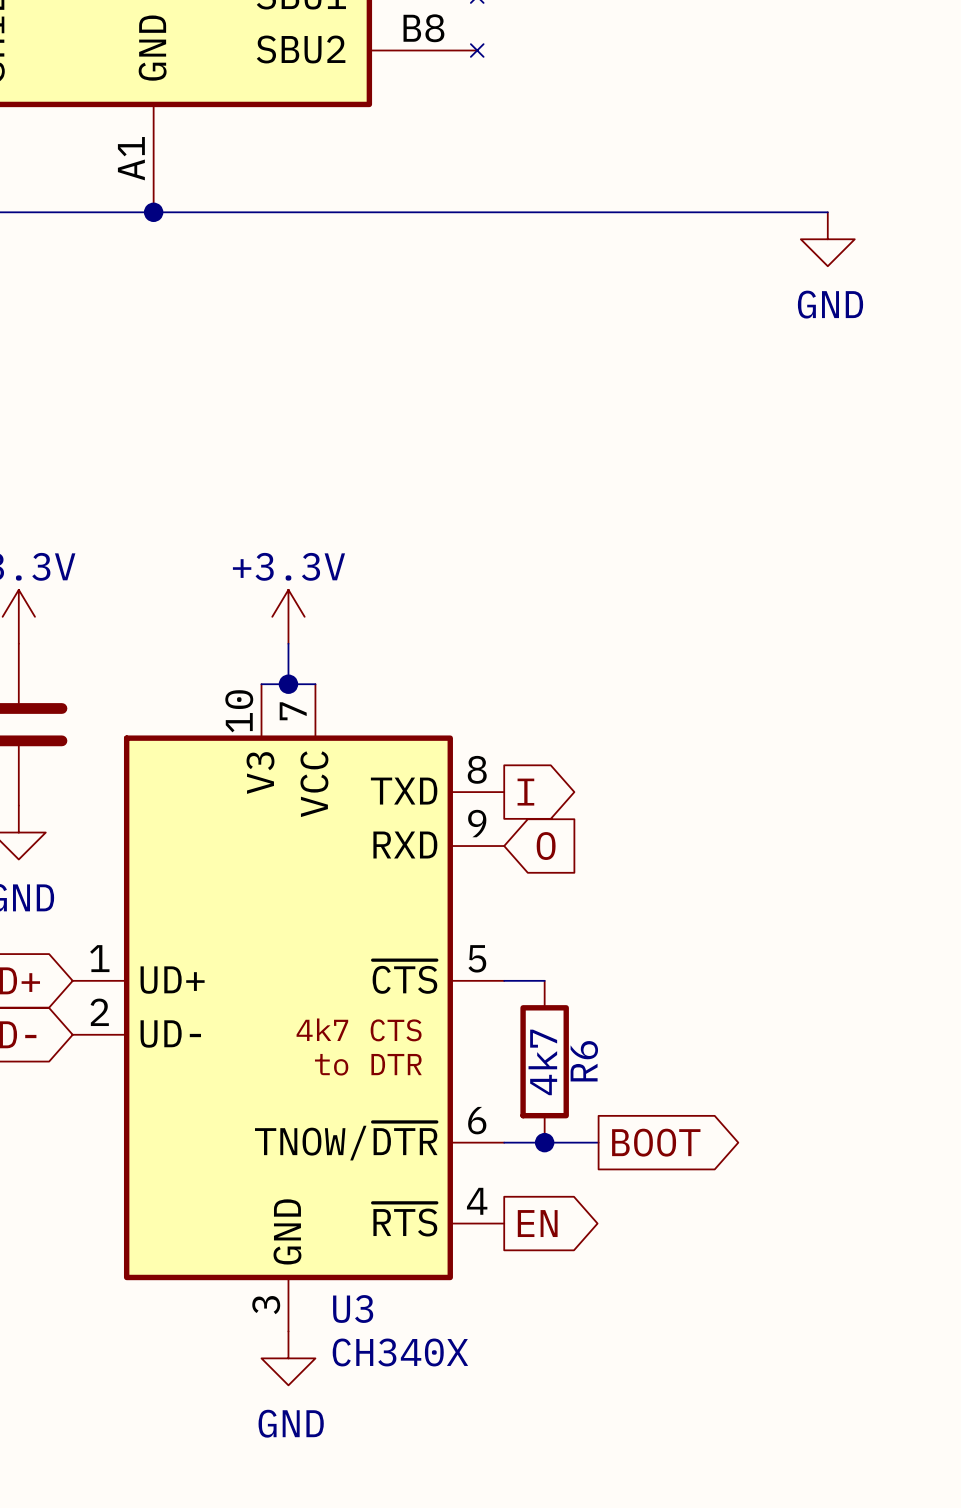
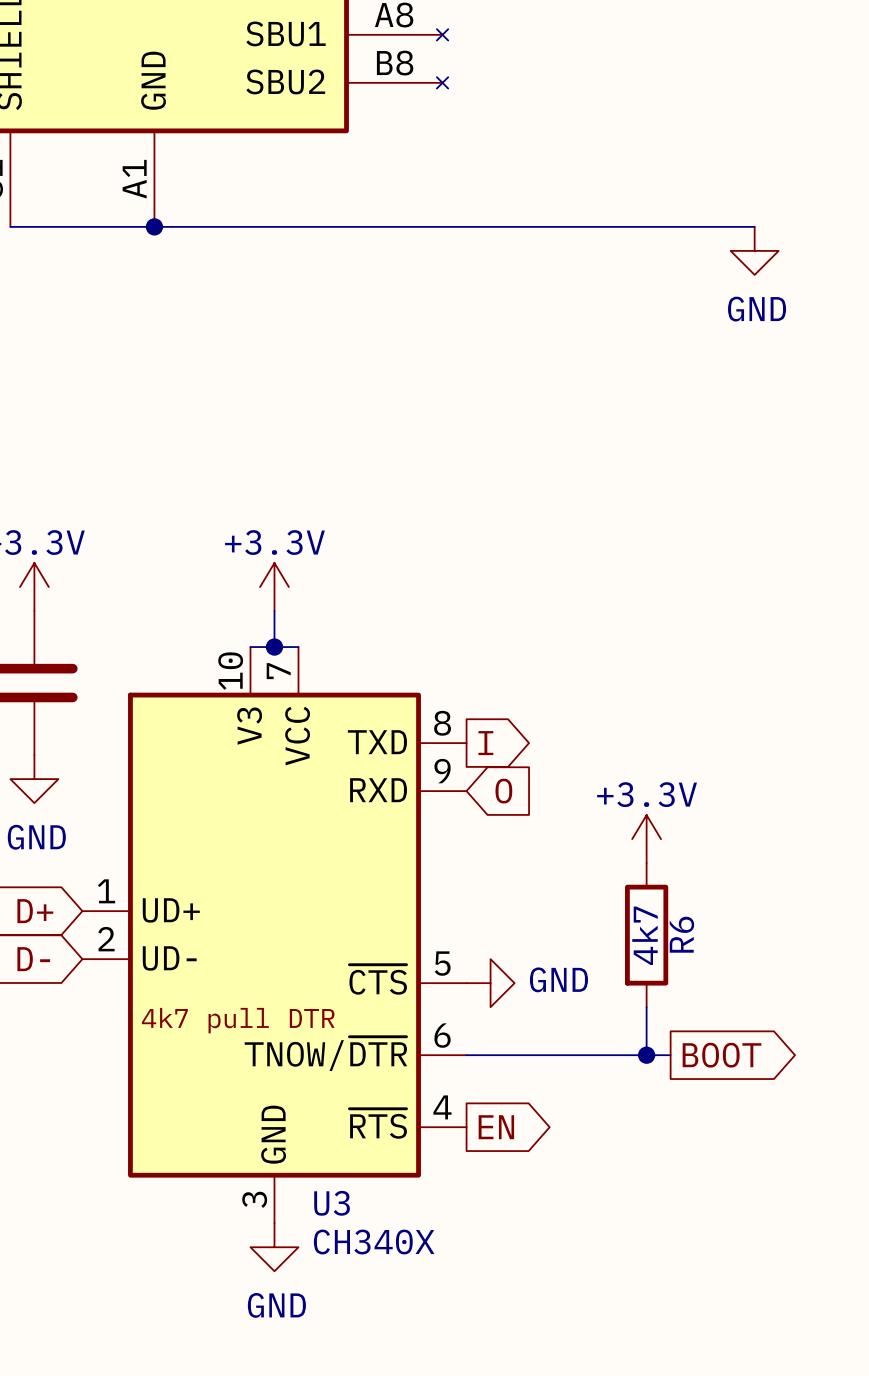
U3 symbol: [72, 684, 505, 1332] -> [82, 647, 467, 1224]
power symbol: none -> +3.3V (646, 839)
wire: (504, 980) (544, 980) -> none
power symbol: none -> GND (490, 983)
R6 position: (544, 1061) -> (646, 935)
wire: none -> (646, 1007) (646, 1055)
junction: (544, 1142) -> none
wire: none -> (550, 1055) (670, 1055)
global label position: BOOT (656, 1142) -> BOOT (721, 1055)
junction: none -> (646, 1055)

